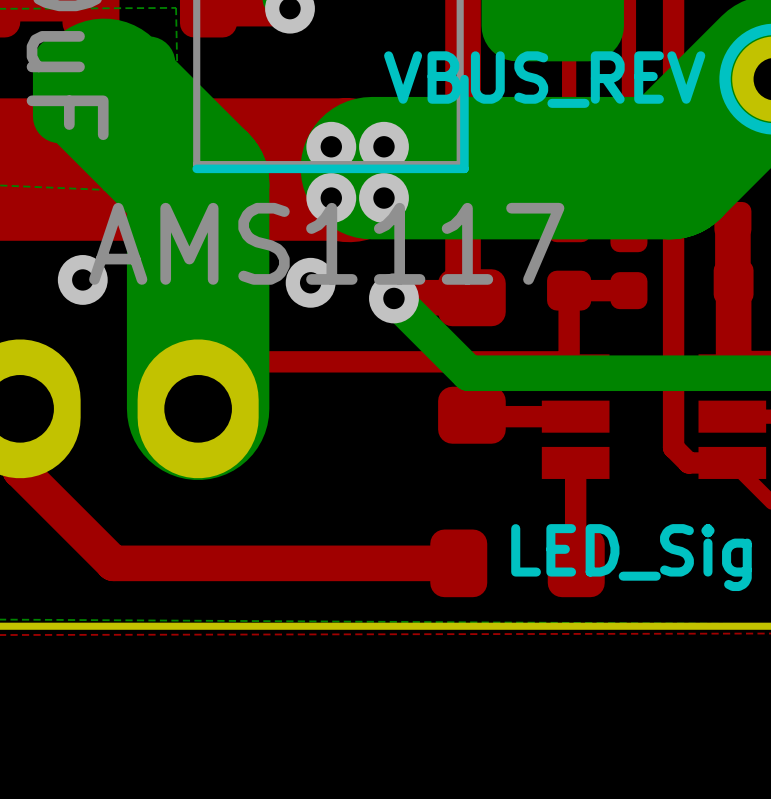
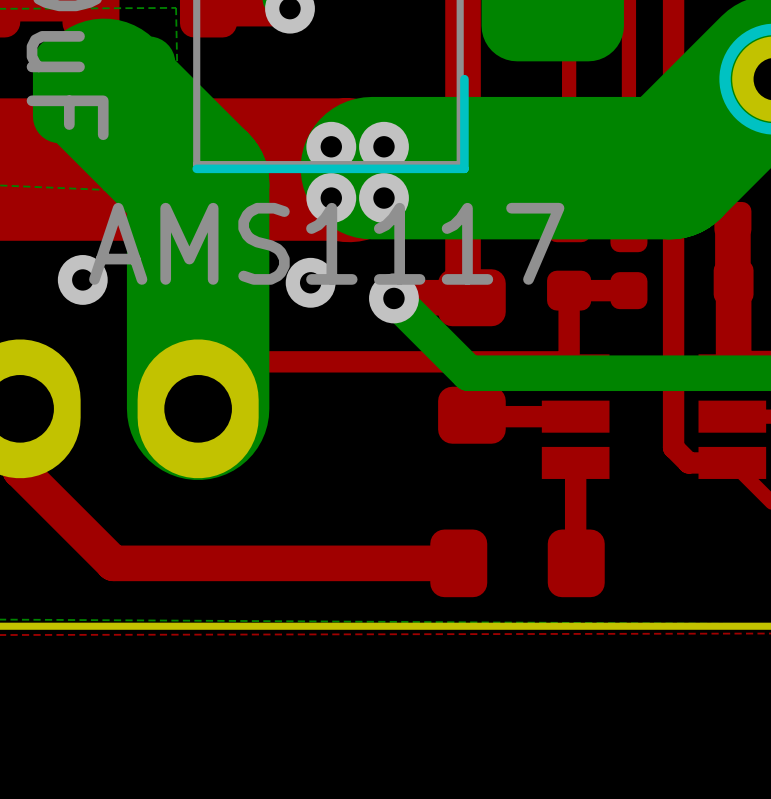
part value: VBUS_REV (544, 79) -> none
part value: LED_Sig (631, 557) -> none

